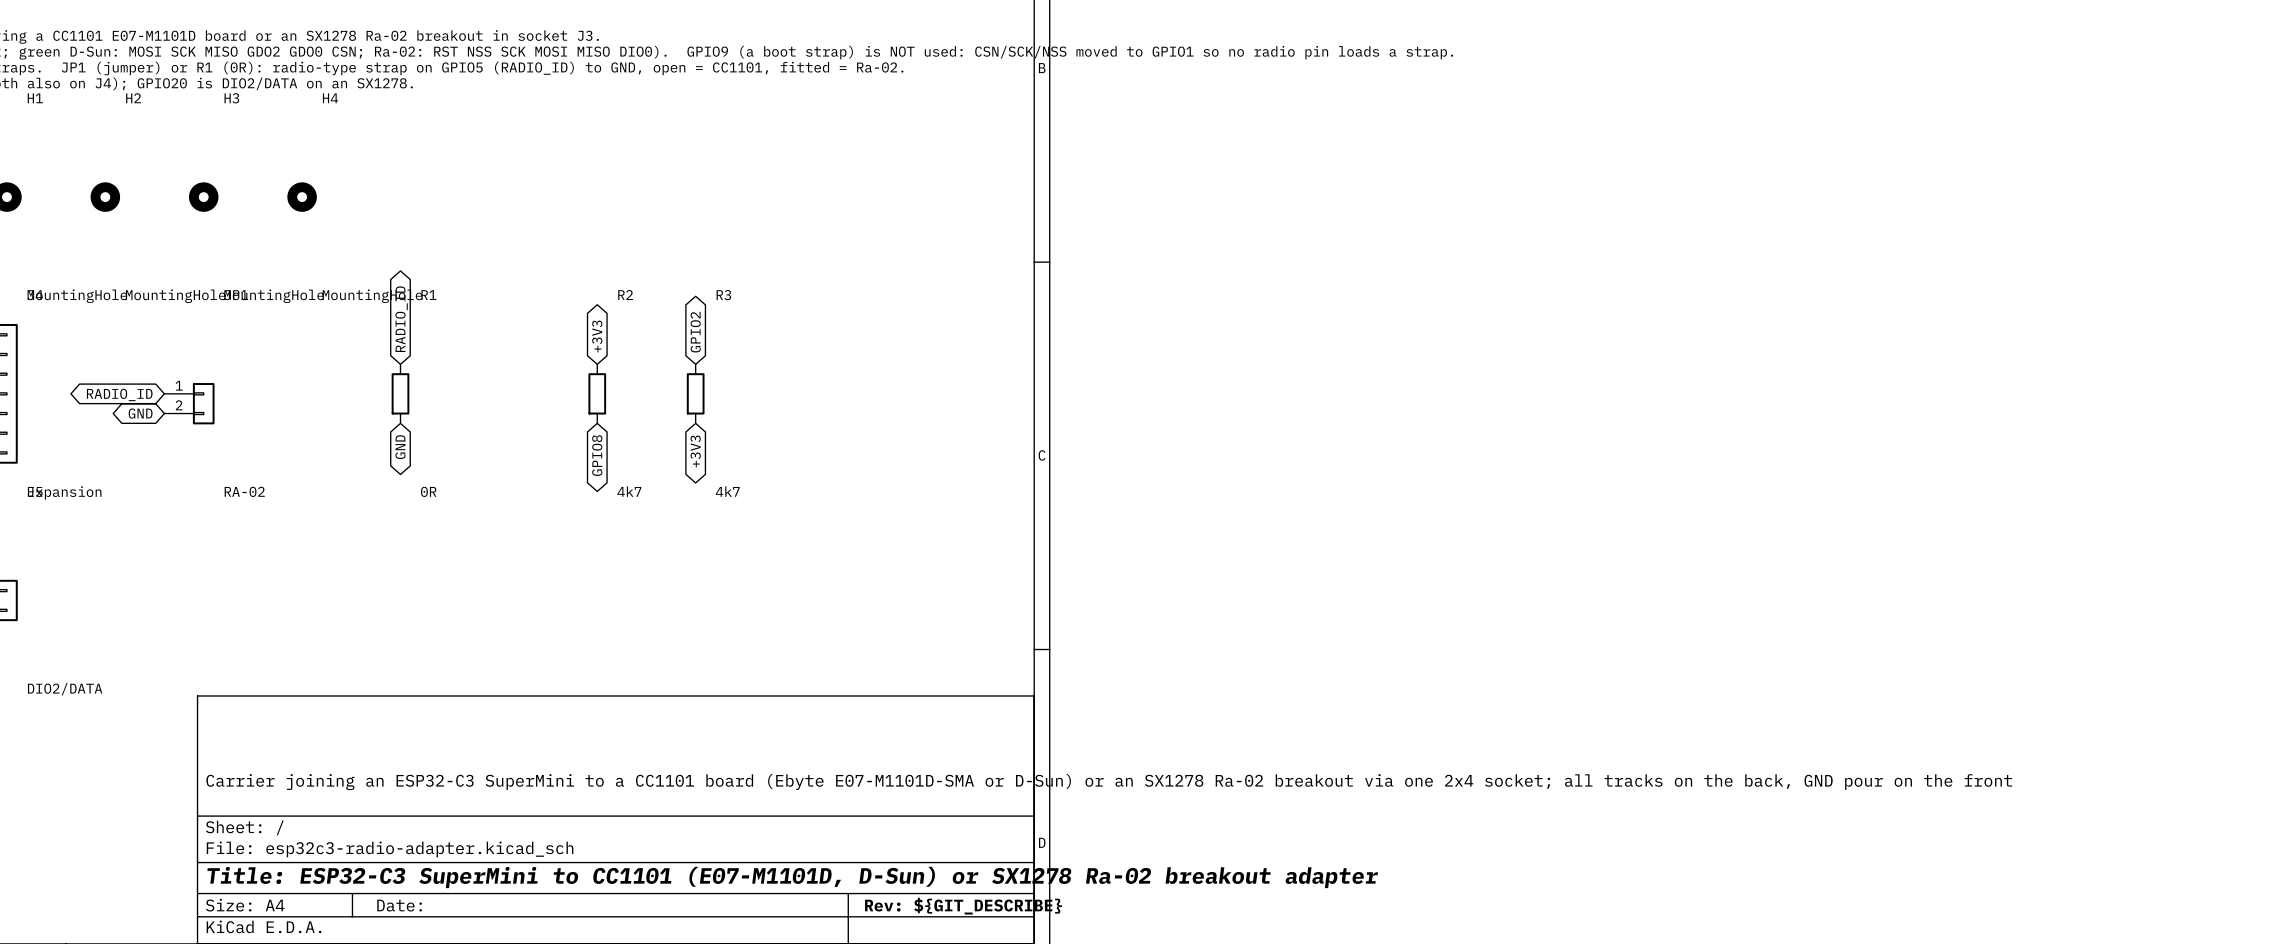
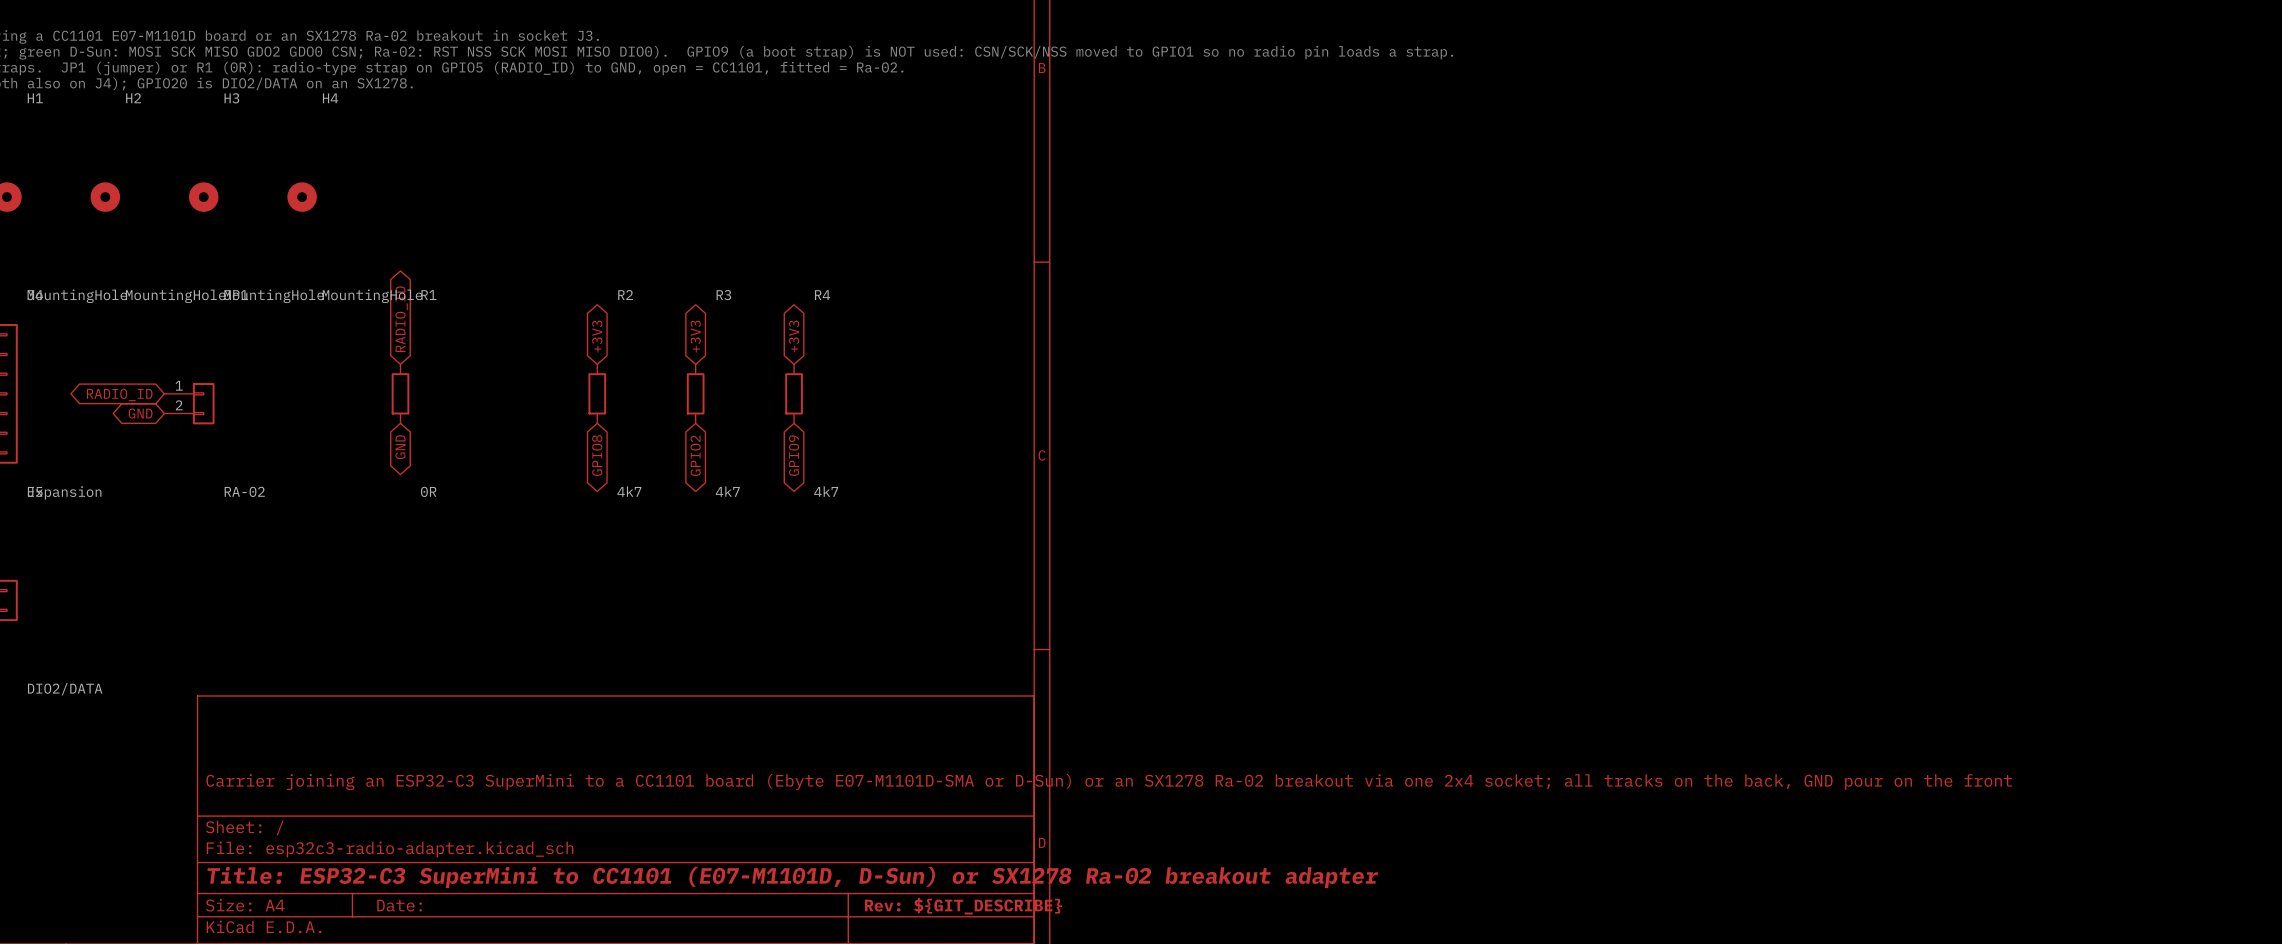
global label: GPIO2 (695, 332) -> +3V3 (695, 336)
global label: none -> +3V3 (794, 336)
R4: none -> 4k7 (794, 393)
global label: +3V3 (695, 451) -> GPIO2 (695, 455)
global label: none -> GPIO9 (794, 455)

